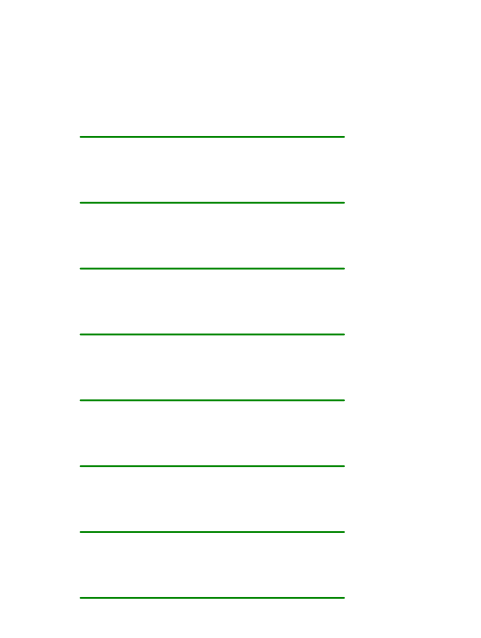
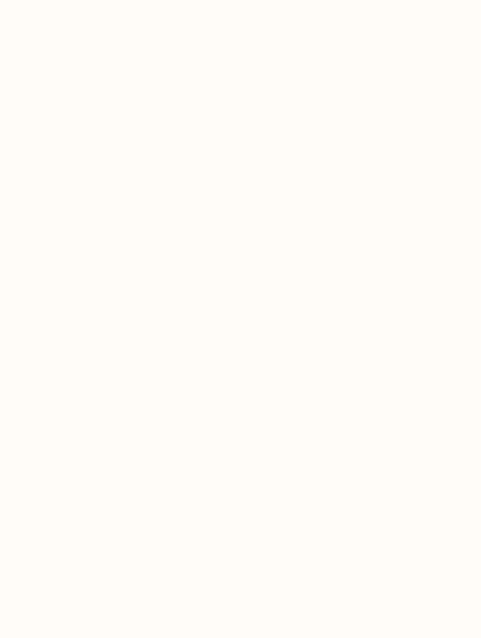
wire: (80, 136) (344, 136) -> none
wire: (80, 202) (344, 202) -> none
wire: (80, 268) (344, 268) -> none
wire: (80, 334) (344, 334) -> none
wire: (80, 400) (344, 400) -> none
wire: (80, 466) (344, 466) -> none
wire: (80, 532) (344, 532) -> none
wire: (80, 597) (344, 597) -> none

